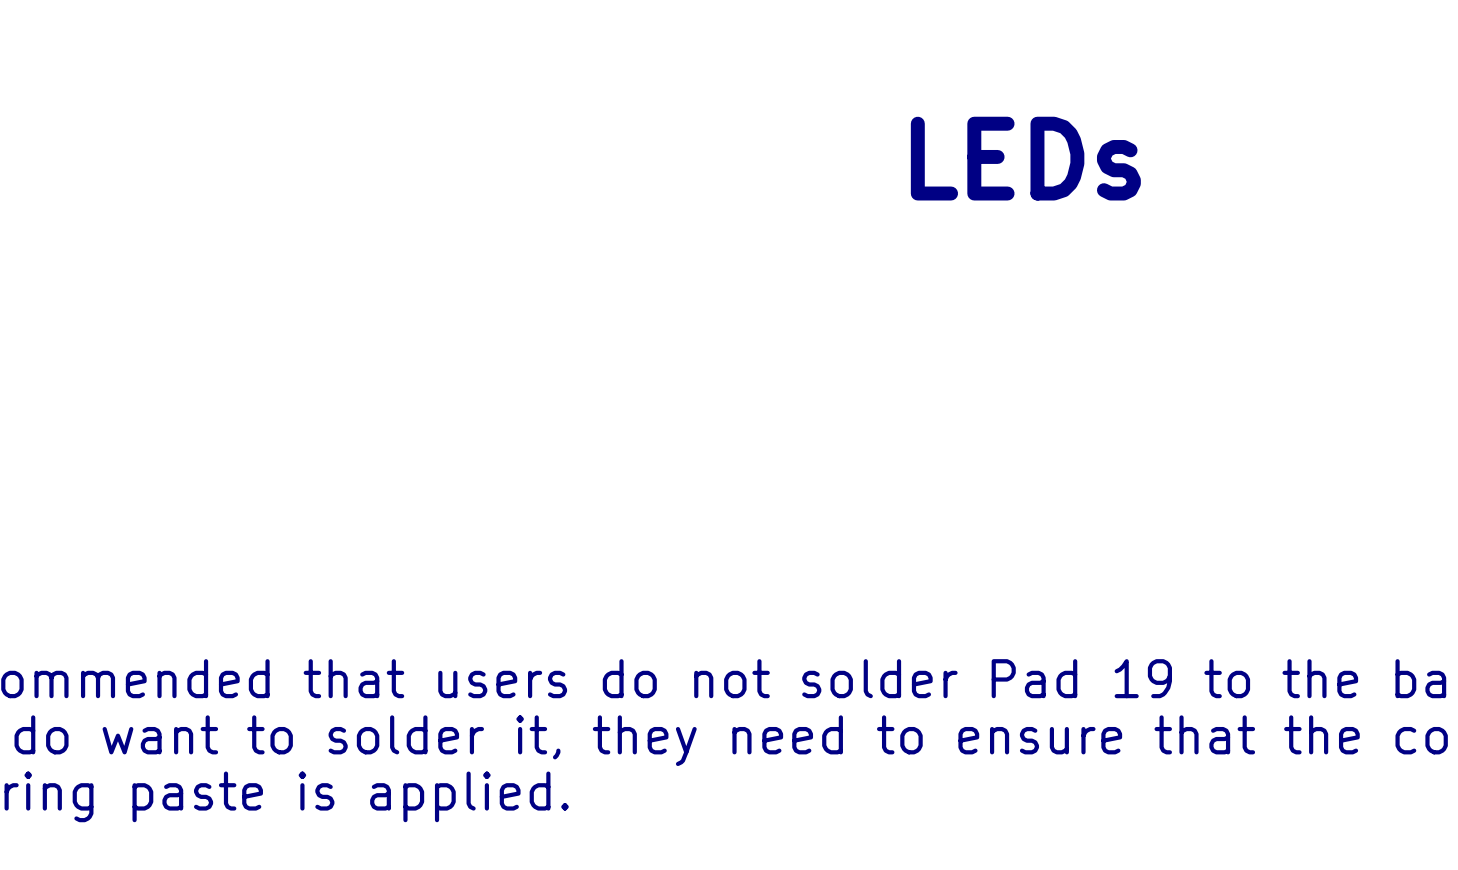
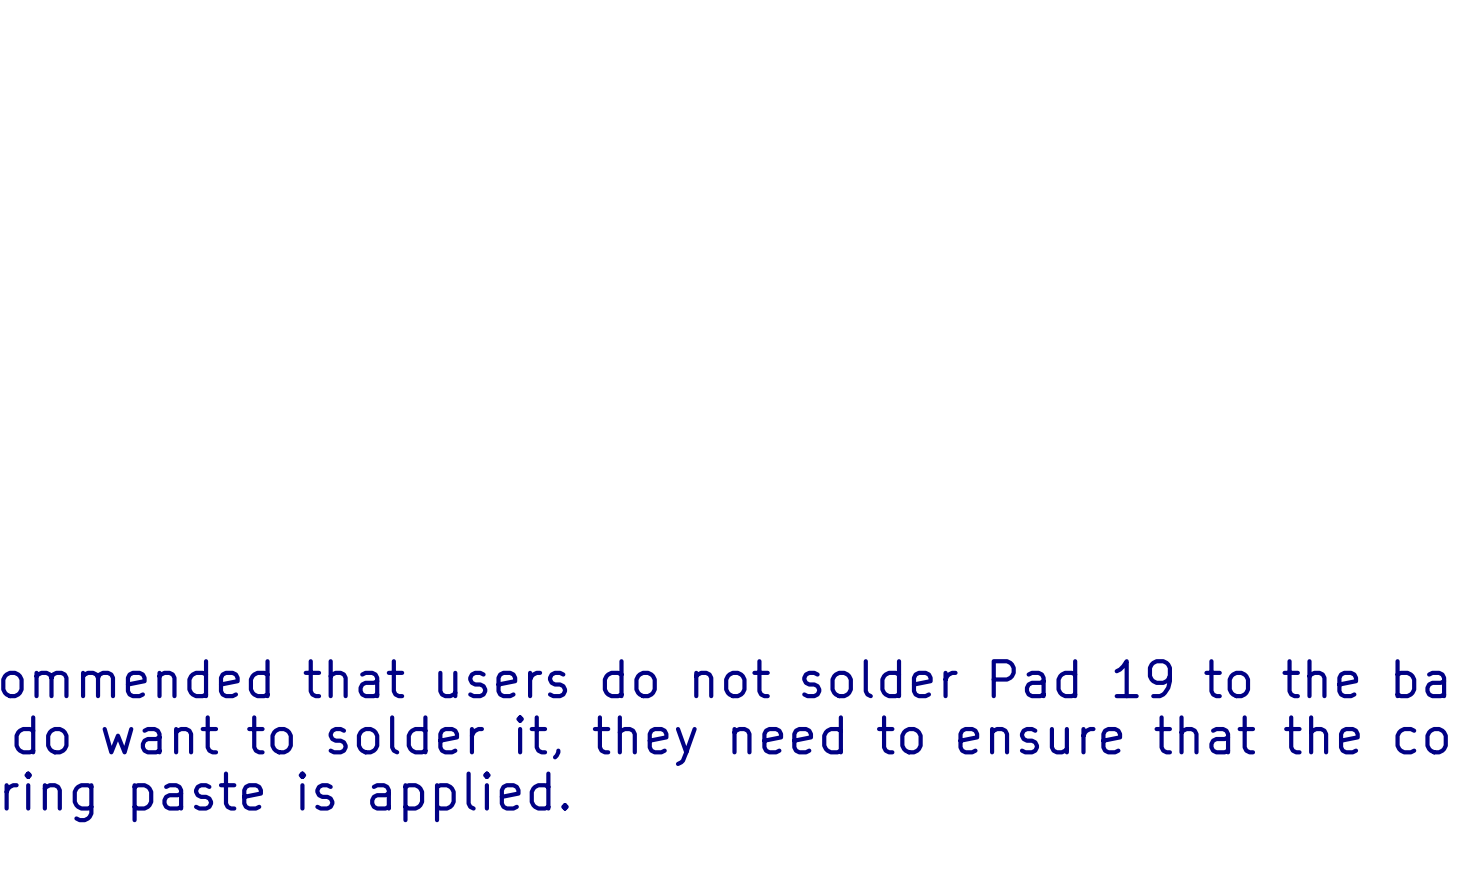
text: LEDs (1025, 158) -> none

